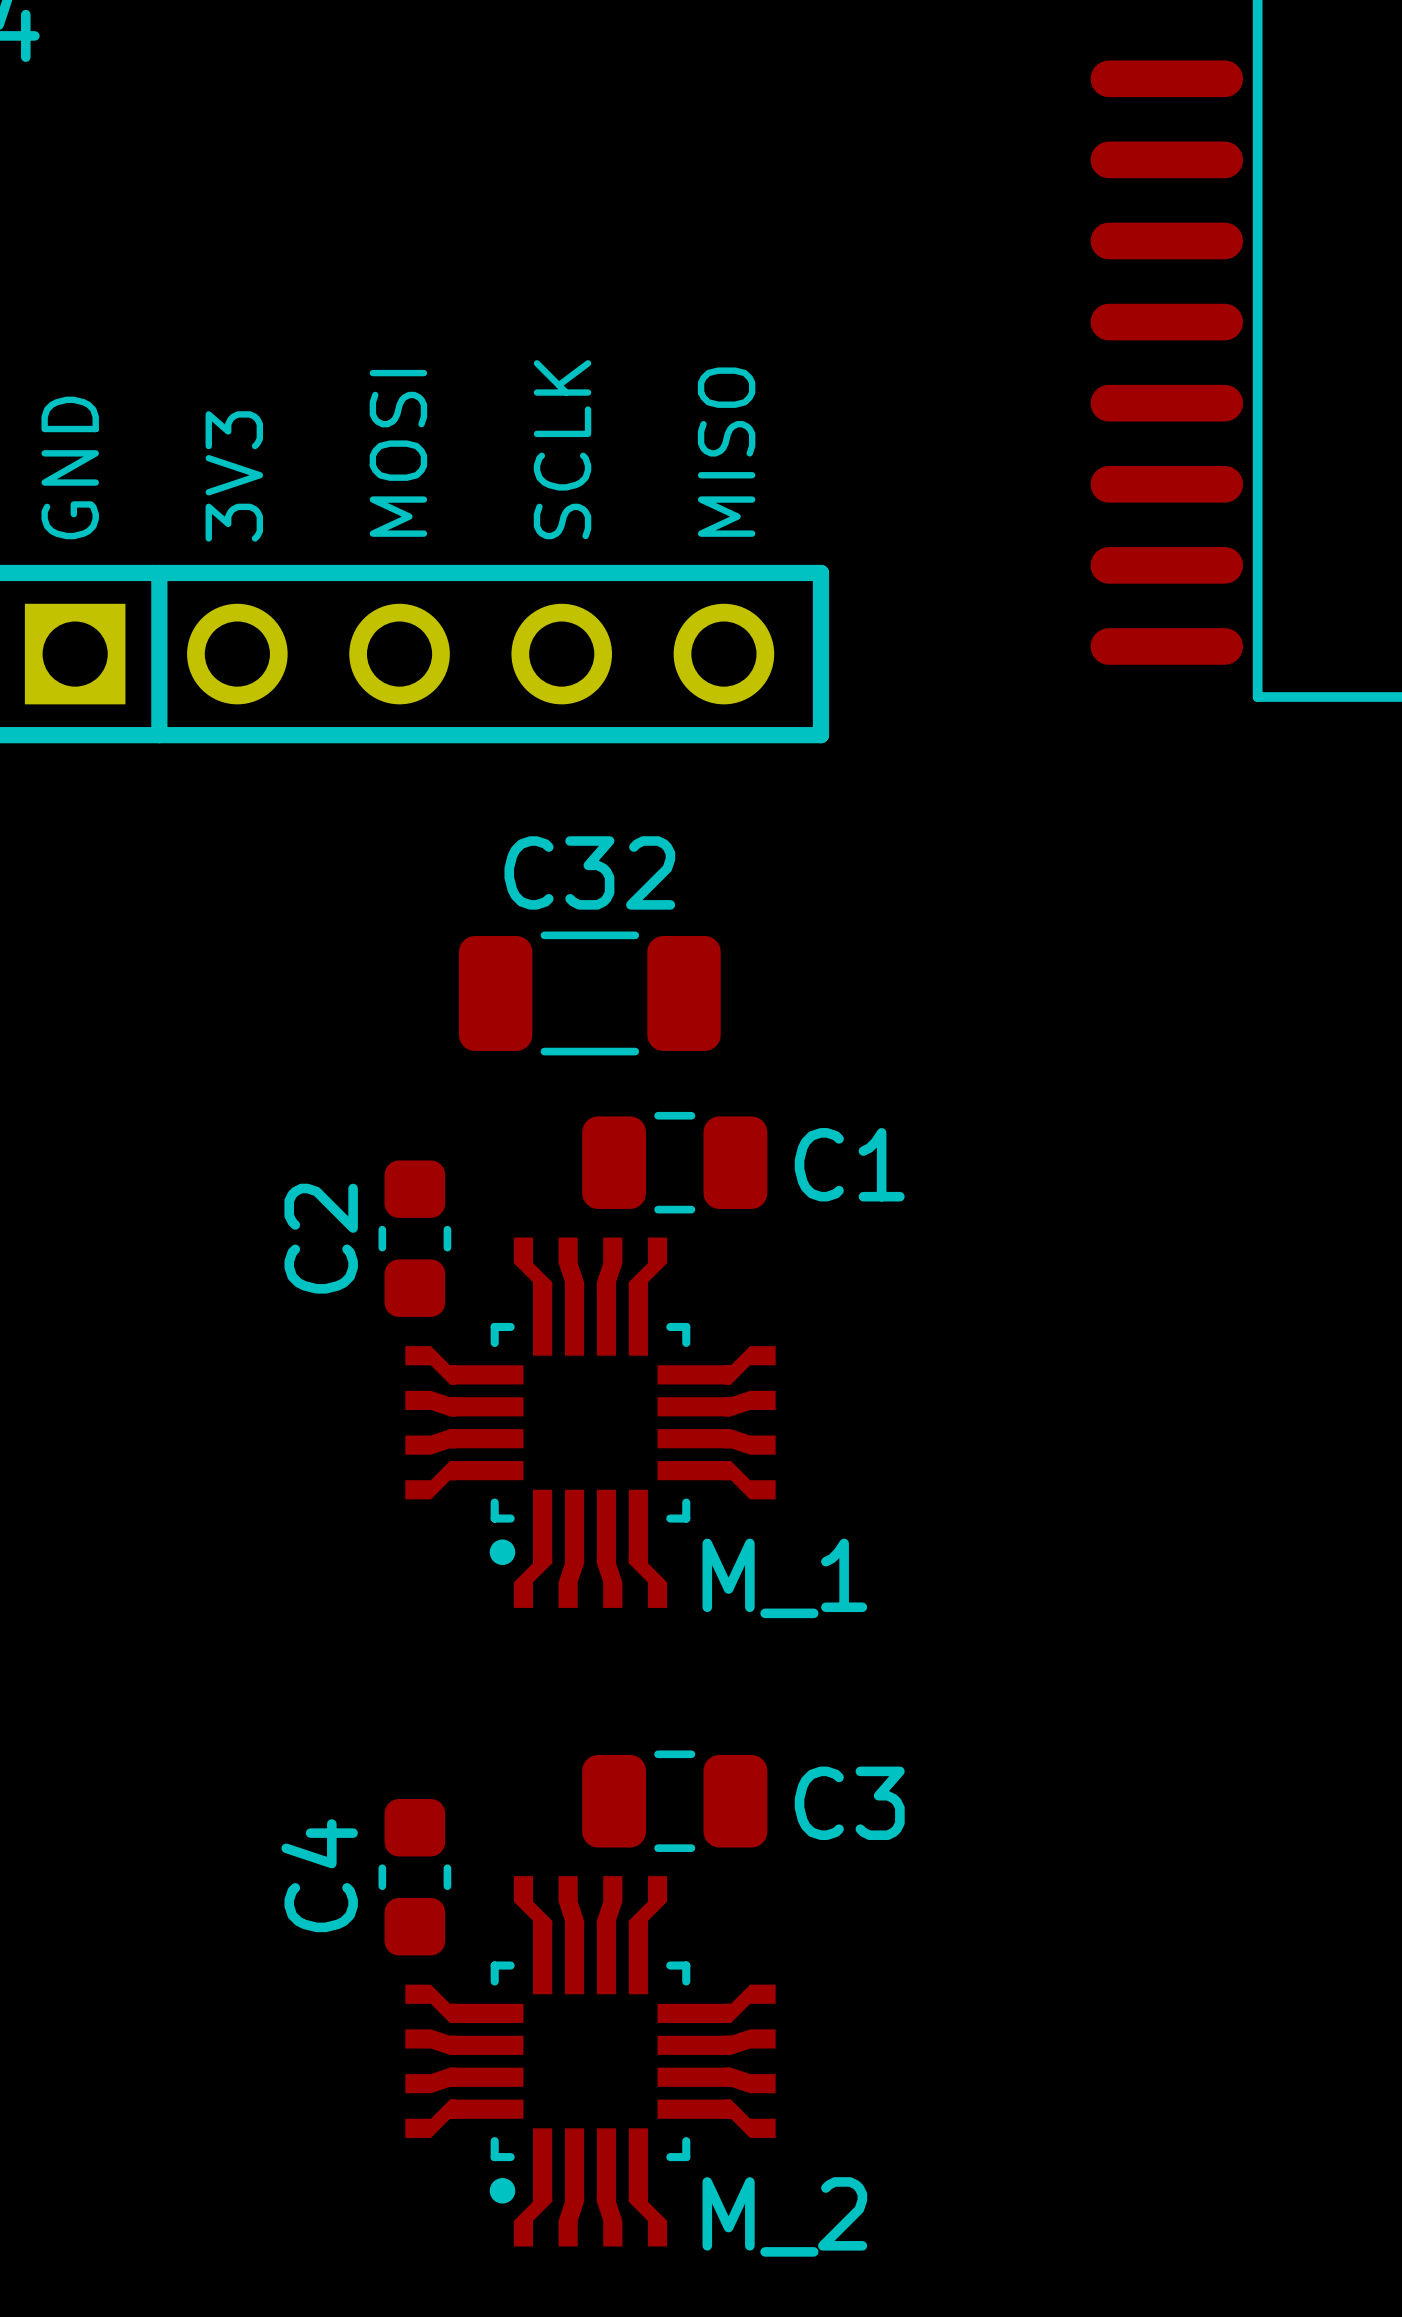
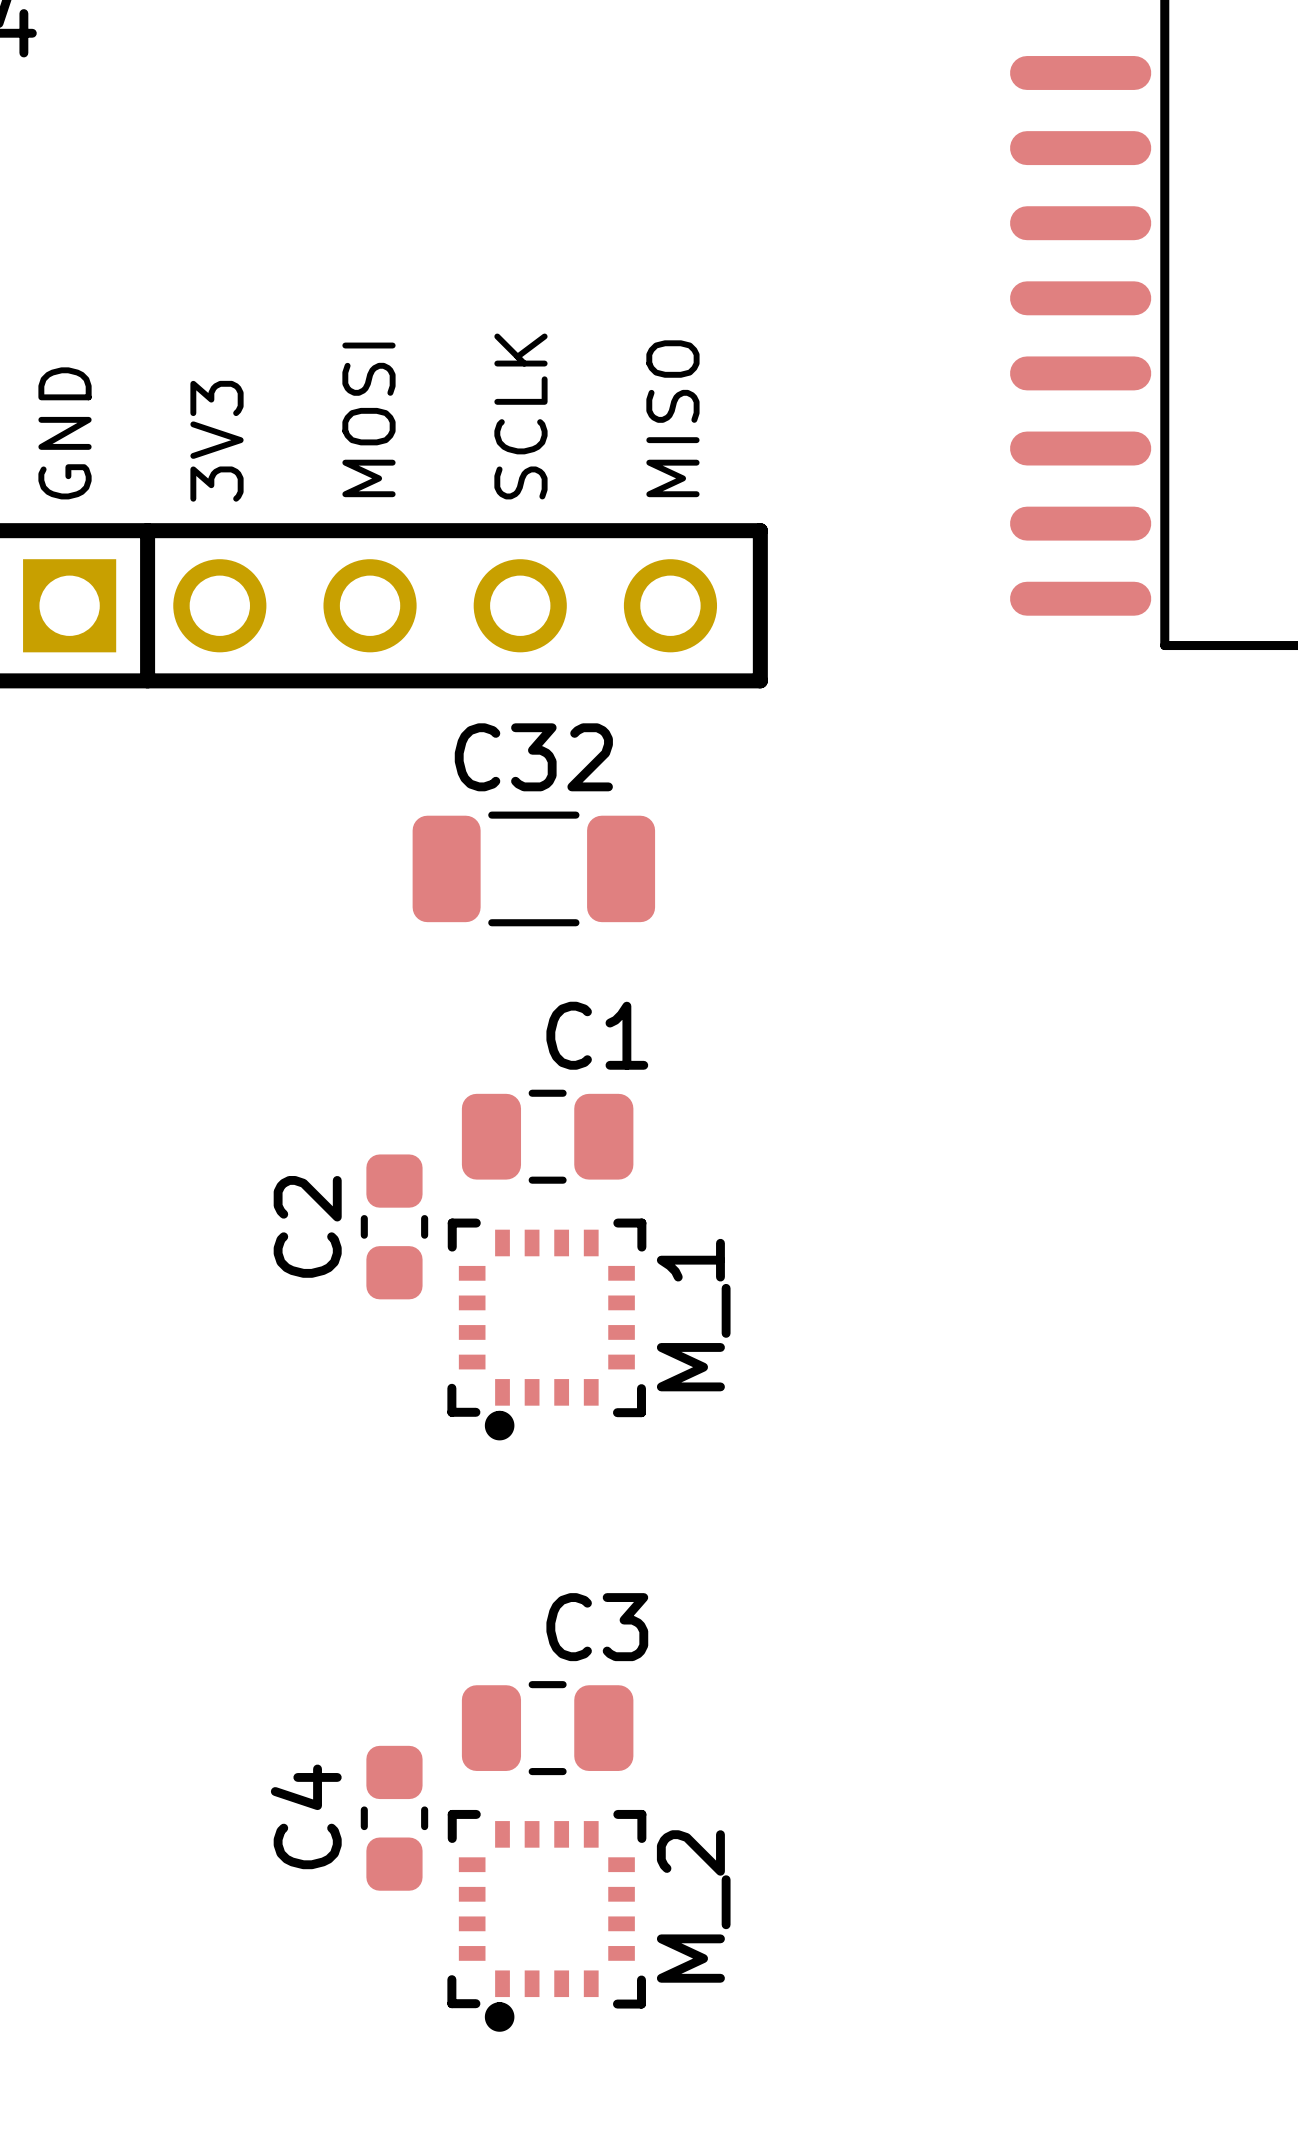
C32 position: (589, 993) -> (533, 868)
C1 position: (674, 1162) -> (547, 1136)
C1 name position: C1 (849, 1164) -> C1 (597, 1035)
M_1 footprint: [405, 1237, 776, 1608] -> [447, 1218, 647, 1441]
C2 position: (414, 1238) -> (394, 1226)
M_1 name position: M_1 (784, 1578) -> M_1 (693, 1315)
C3 position: (674, 1801) -> (547, 1728)
C3 name position: C3 (849, 1803) -> C3 (597, 1627)
M_2 footprint: [405, 1876, 776, 2247] -> [447, 1809, 647, 2032]
C4 position: (414, 1877) -> (394, 1818)
M_2 name position: M_2 (784, 2216) -> M_2 (693, 1906)

